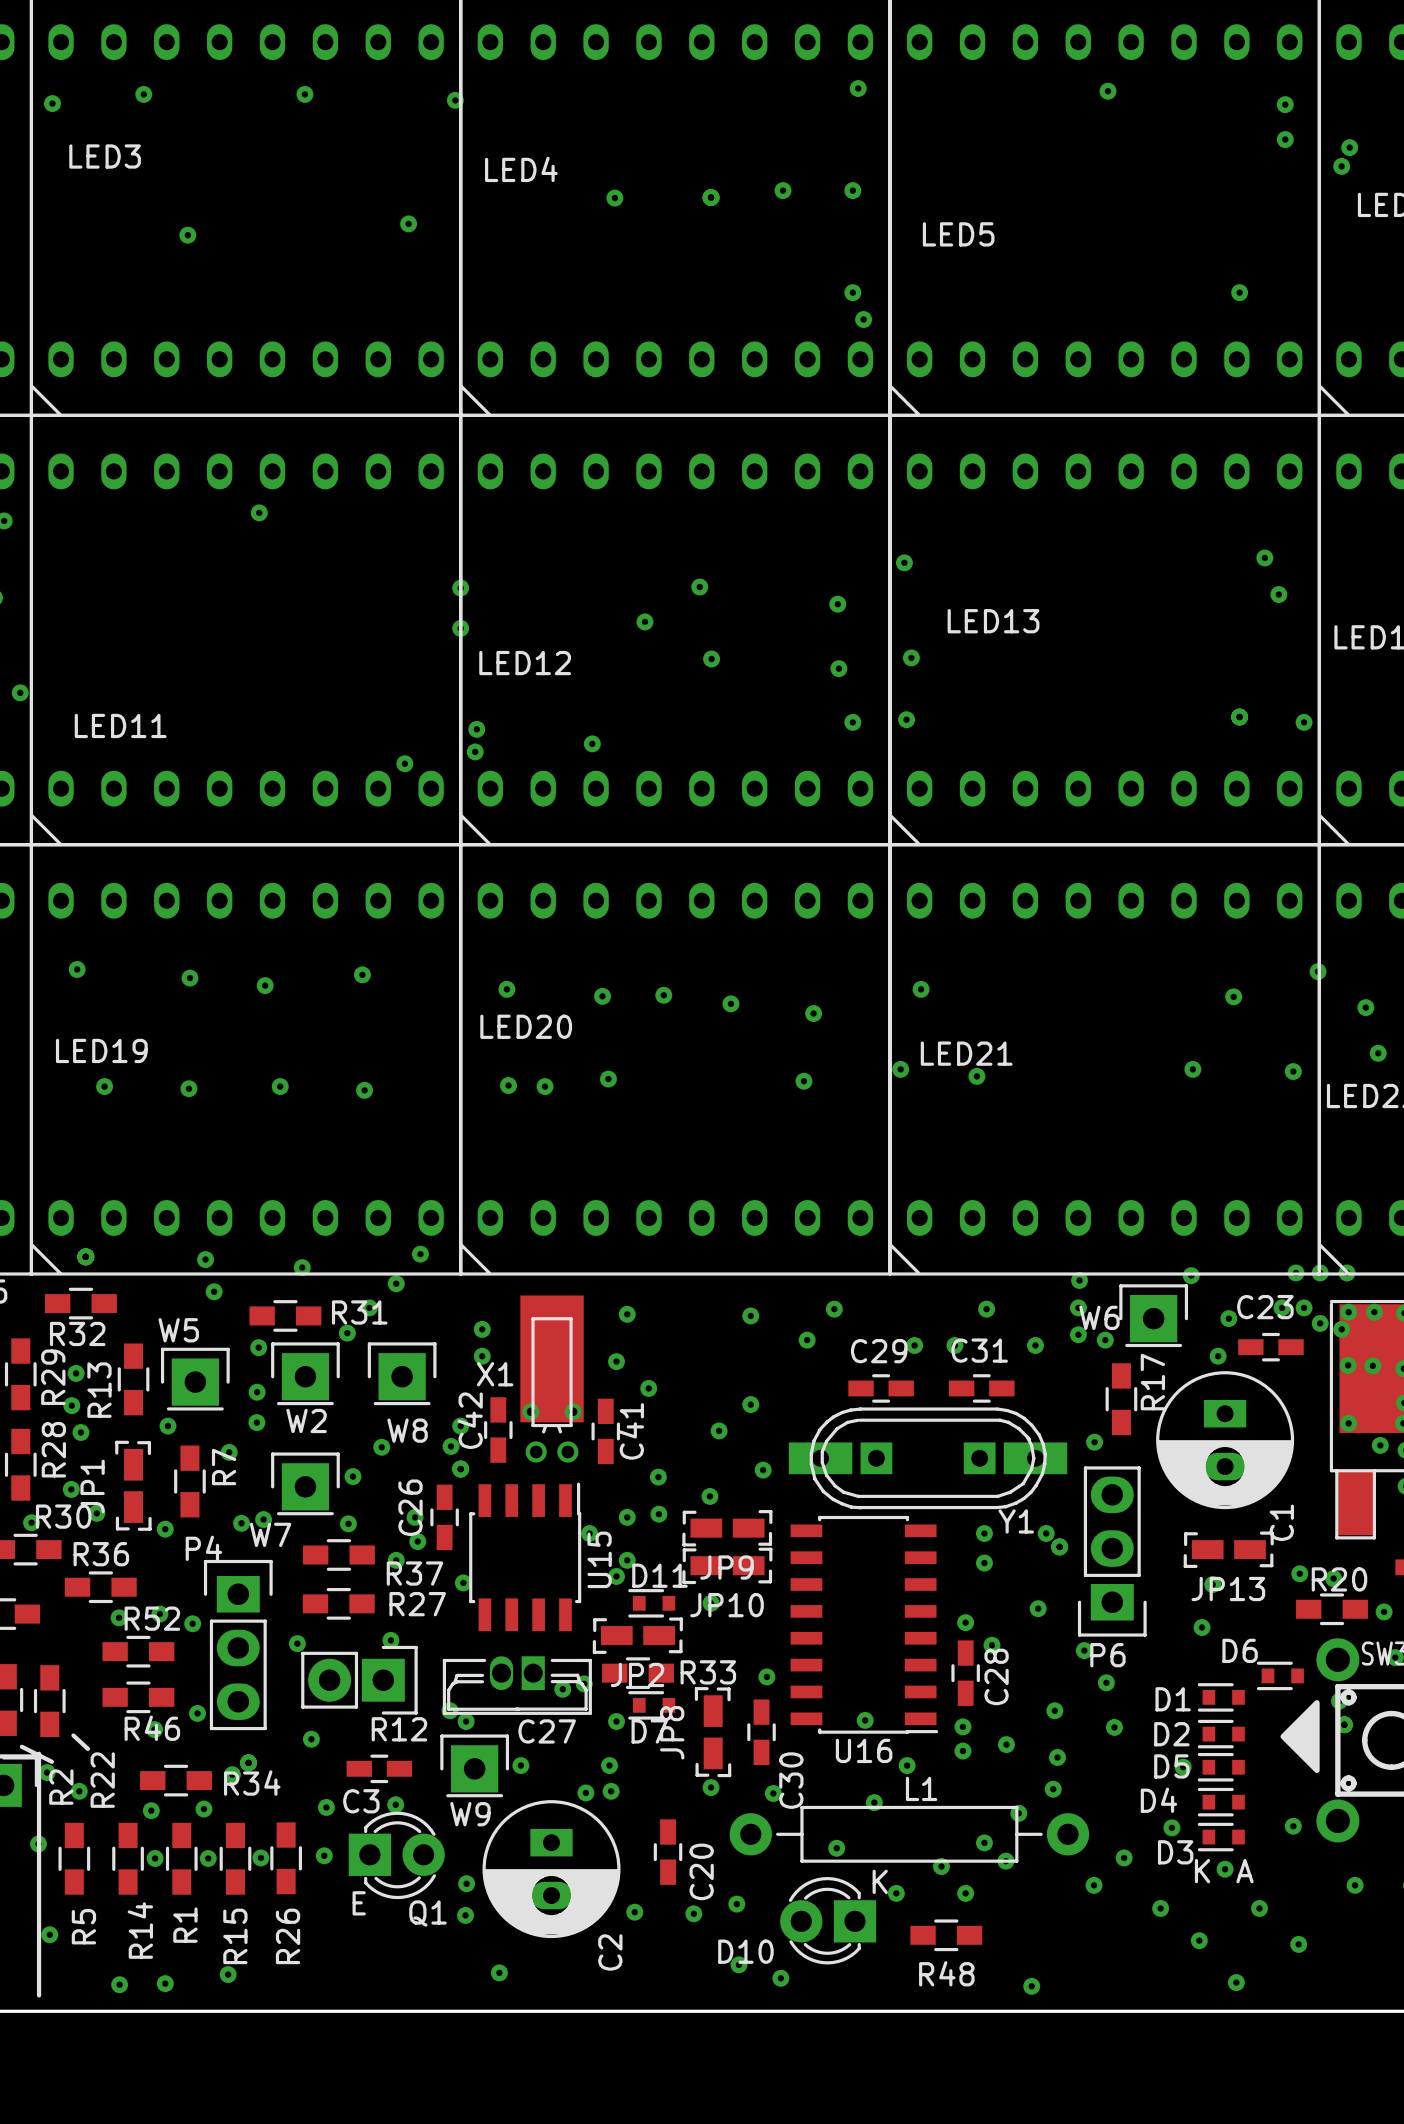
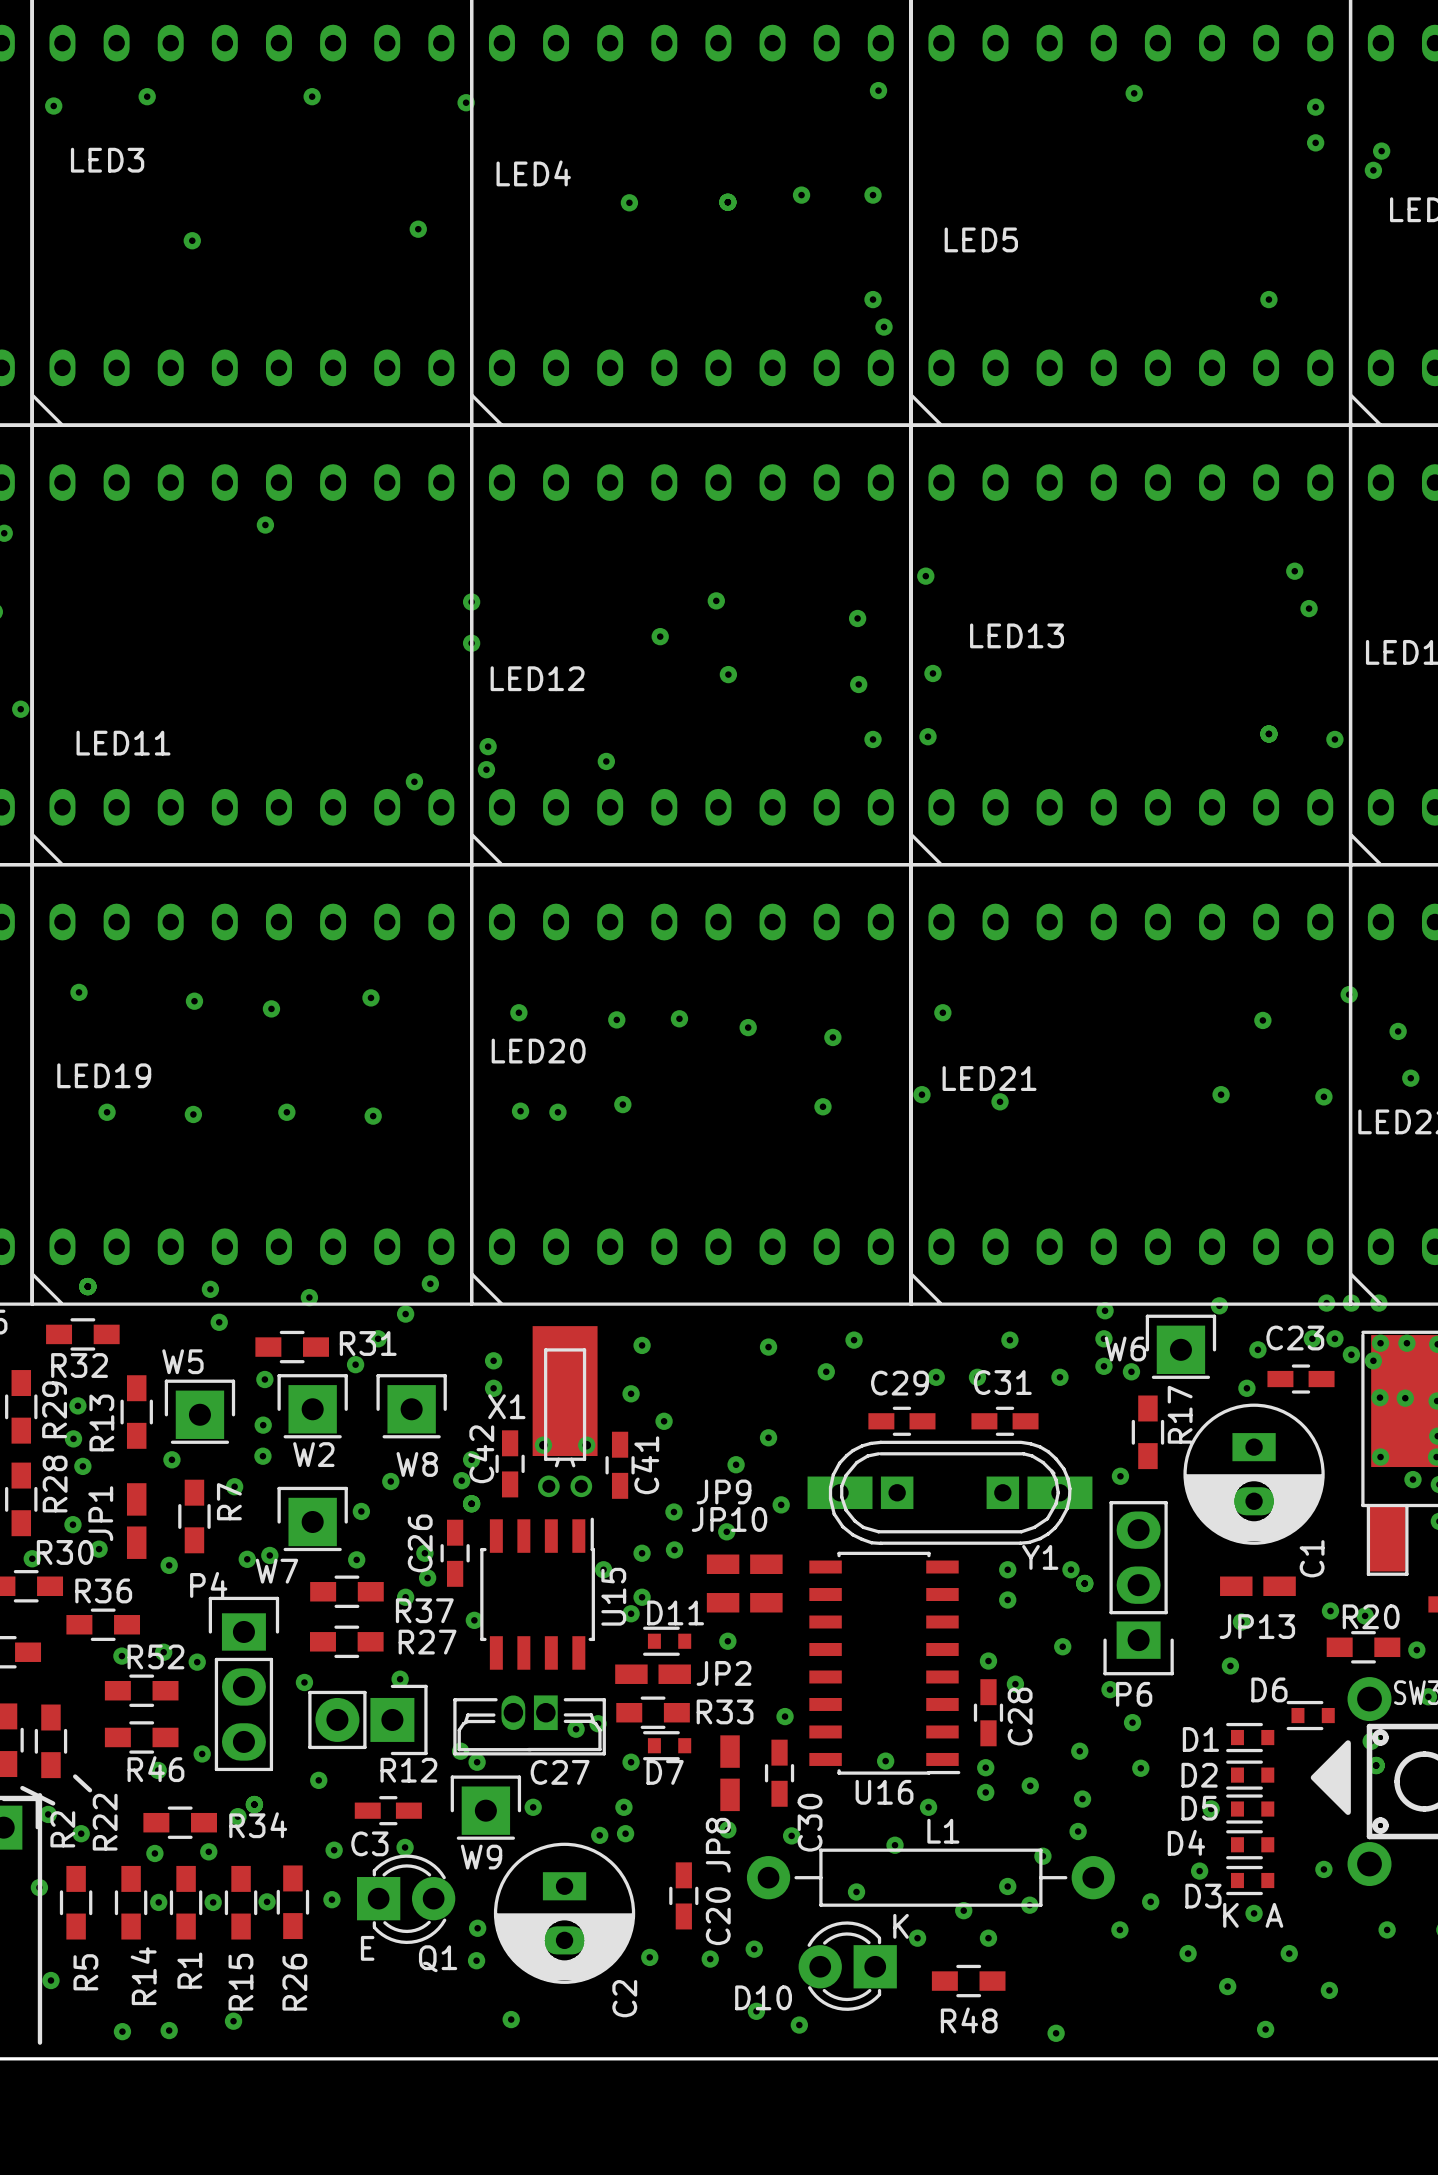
JP1 footprint: [115, 1440, 152, 1531] -> [126, 1483, 147, 1559]
JP9 footprint: [682, 1510, 773, 1547] -> [706, 1554, 783, 1575]
JP13 footprint: [1183, 1531, 1274, 1568] -> [1220, 1576, 1296, 1597]
JP10 footprint: [682, 1547, 773, 1585] -> [706, 1593, 783, 1613]
JP9 name position: JP9 (727, 1567) -> JP9 (724, 1491)
JP10 name position: JP10 (727, 1605) -> JP10 (729, 1519)
JP2 footprint: [592, 1617, 683, 1654] -> [615, 1664, 691, 1684]
JP2 name position: JP2 (637, 1674) -> JP2 (724, 1673)
JP8 footprint: [694, 1687, 732, 1778] -> [720, 1735, 740, 1812]
JP8 name position: JP8 (672, 1732) -> JP8 (718, 1845)

